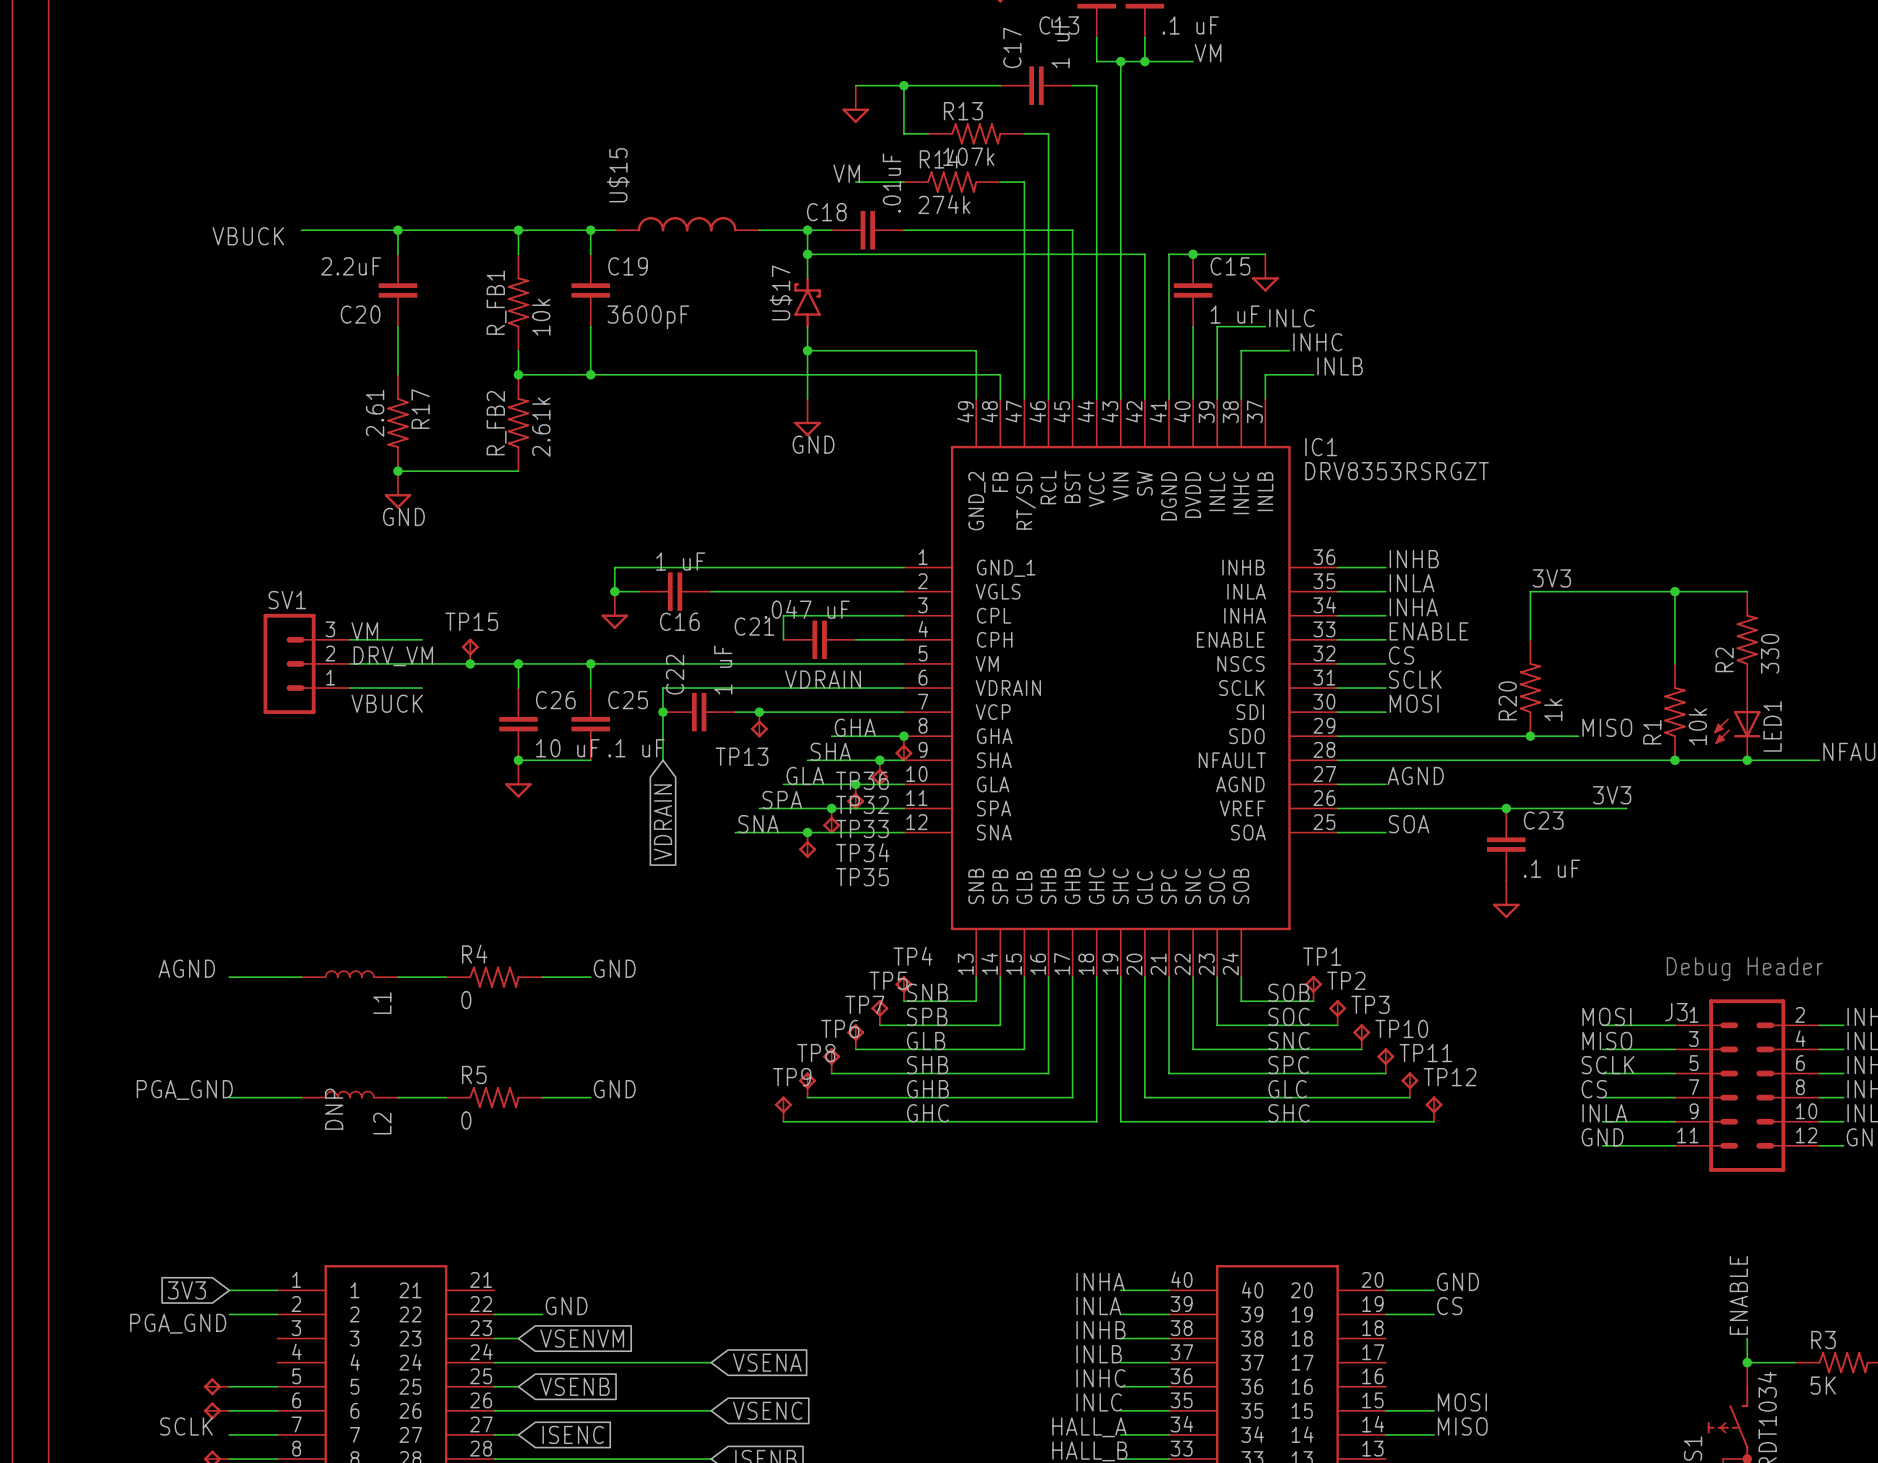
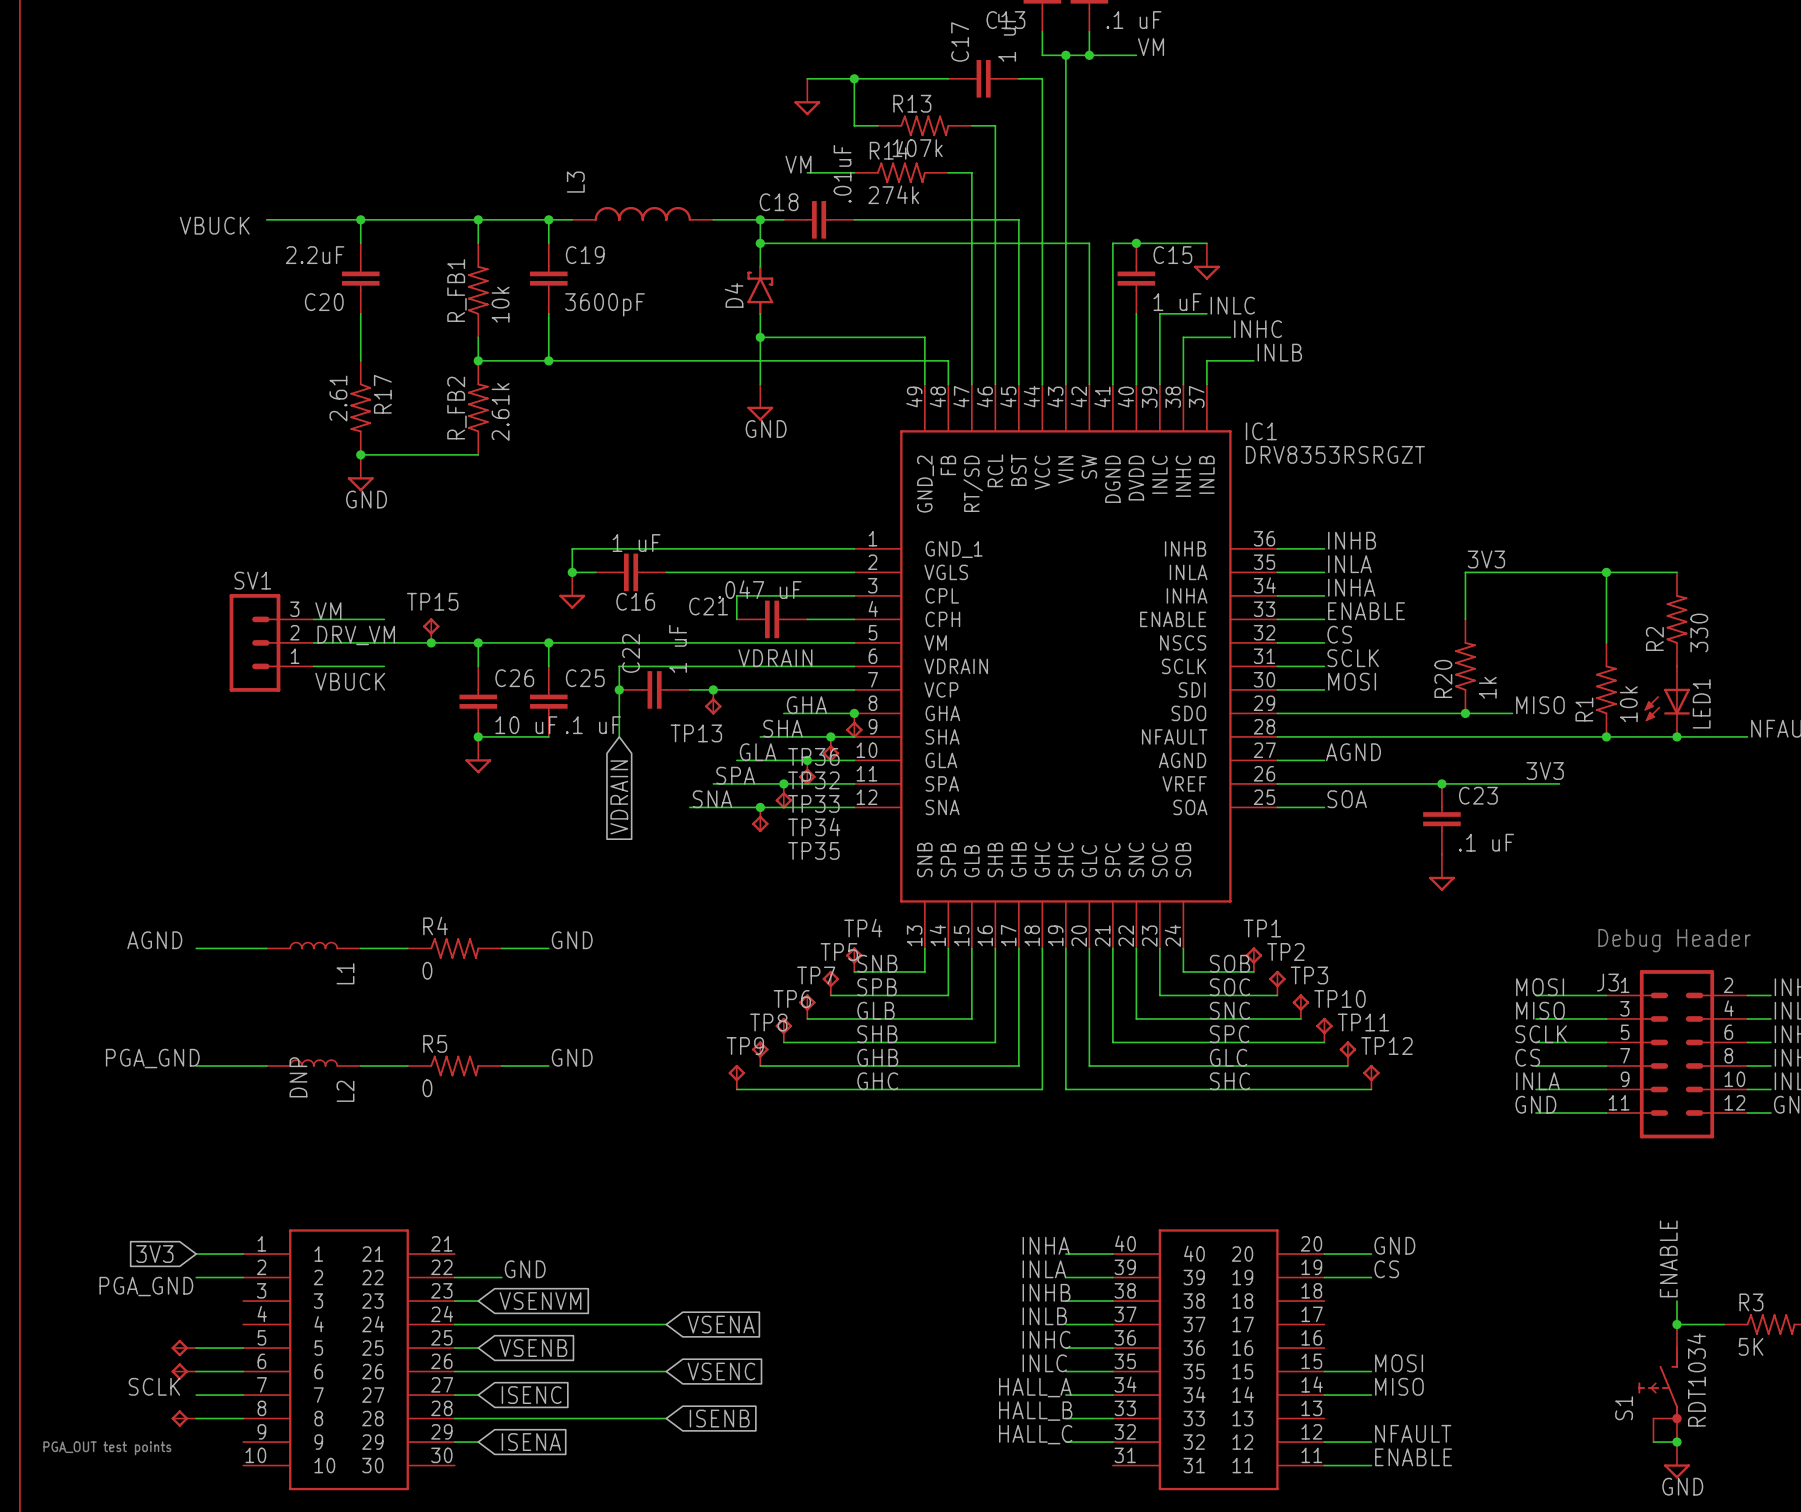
U$15 name: U$15 (618, 175) -> L3 (575, 182)
U$17 name: U$17 (781, 292) -> D4 (734, 295)

